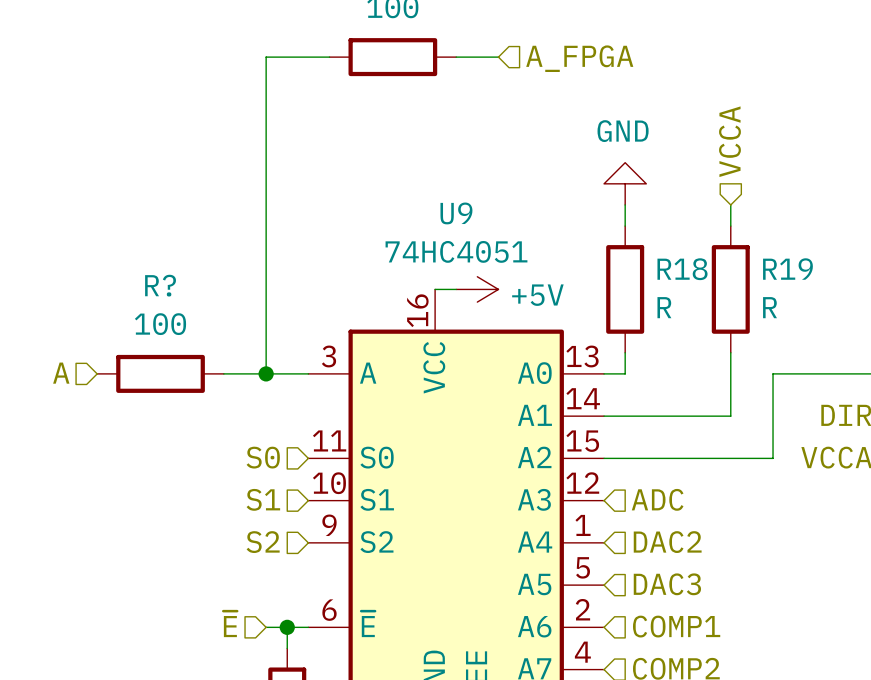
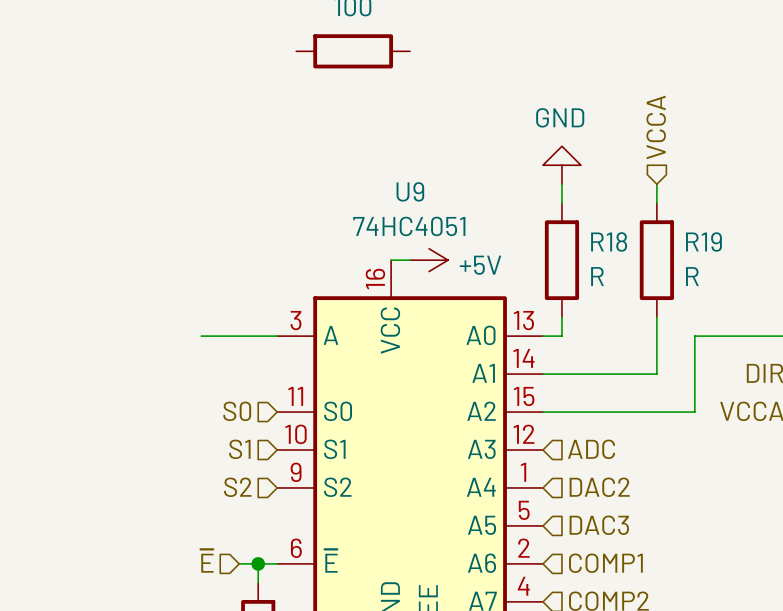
wire: (329, 57) (266, 57) (266, 373) -> none
wire: (456, 57) (498, 57) -> none
hierarchical label: A_FPGA (579, 58) -> none
hierarchical label: A (61, 373) -> none
R?: 100 (160, 373) -> none
junction: (266, 373) -> none

